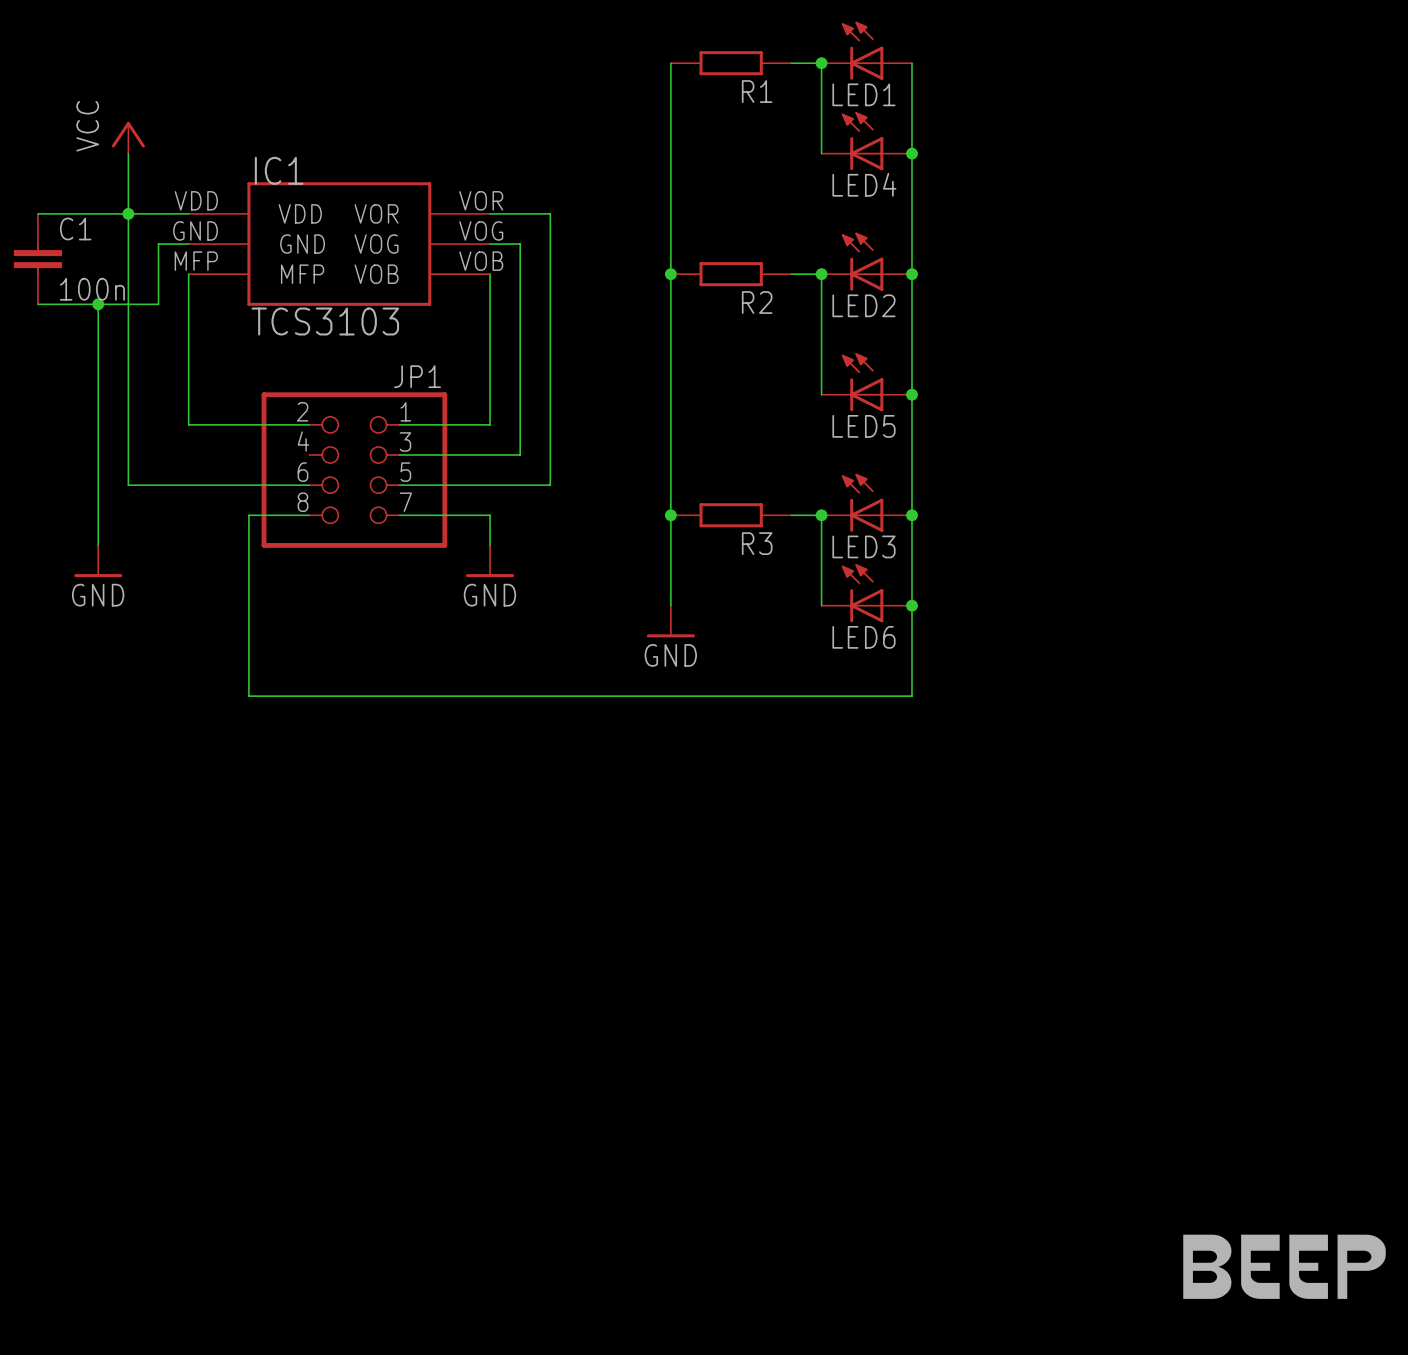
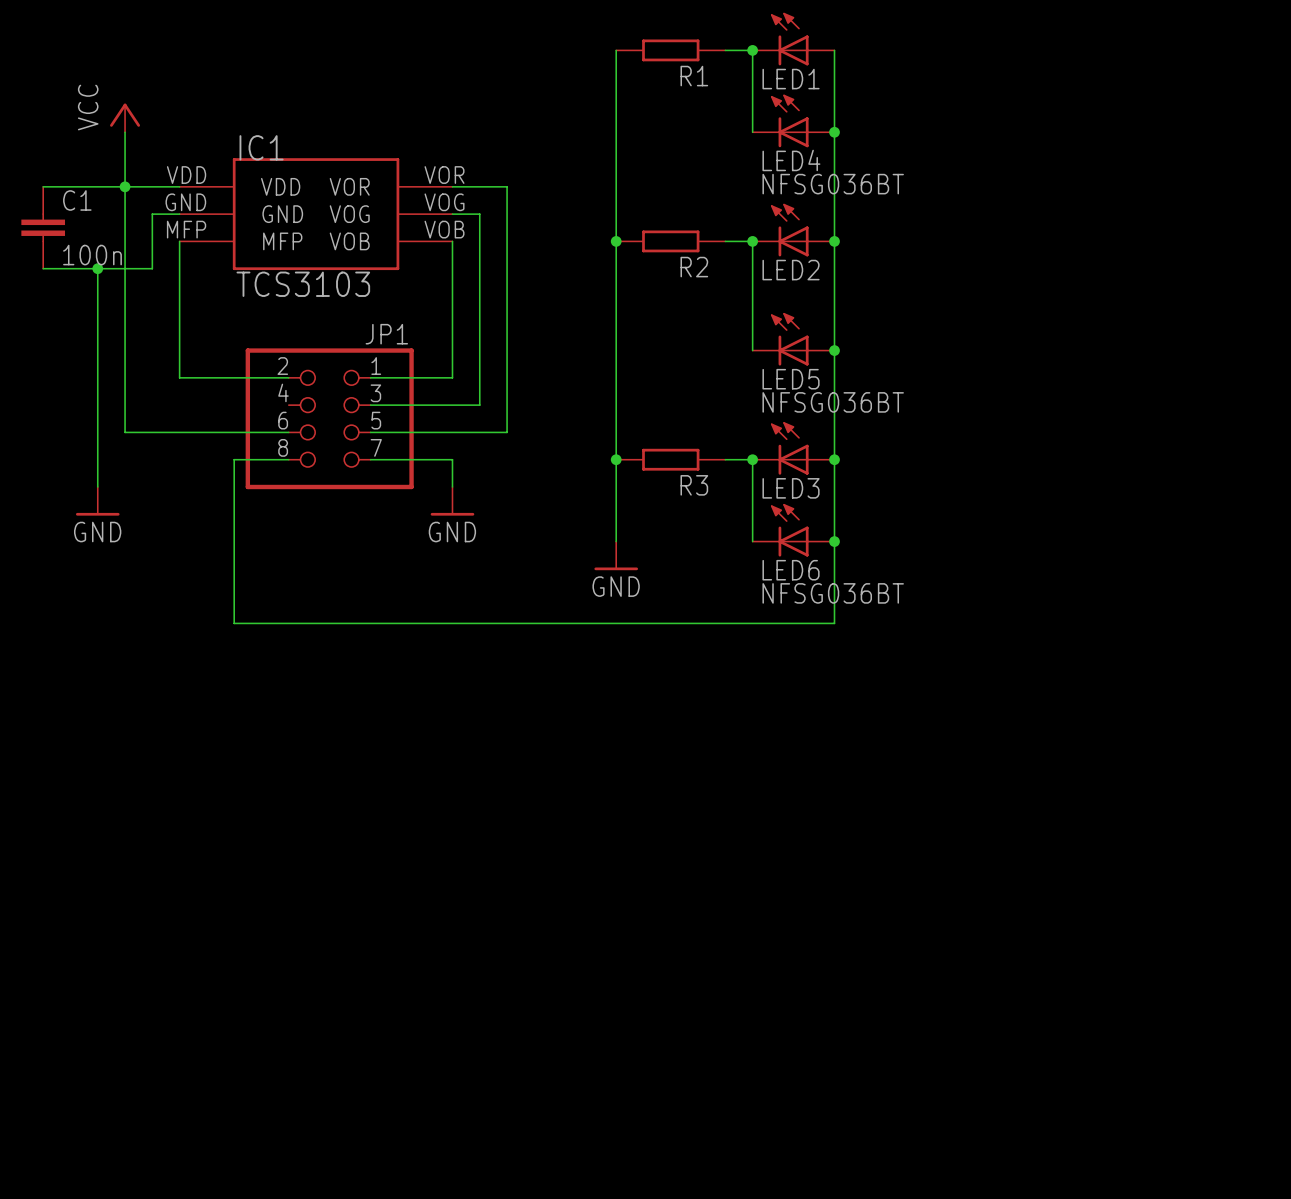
LED4 value: none -> NFSG036BT (833, 184)
LED5 value: none -> NFSG036BT (833, 402)
LED6 value: none -> NFSG036BT (833, 593)
part: (1284, 1266) -> none

